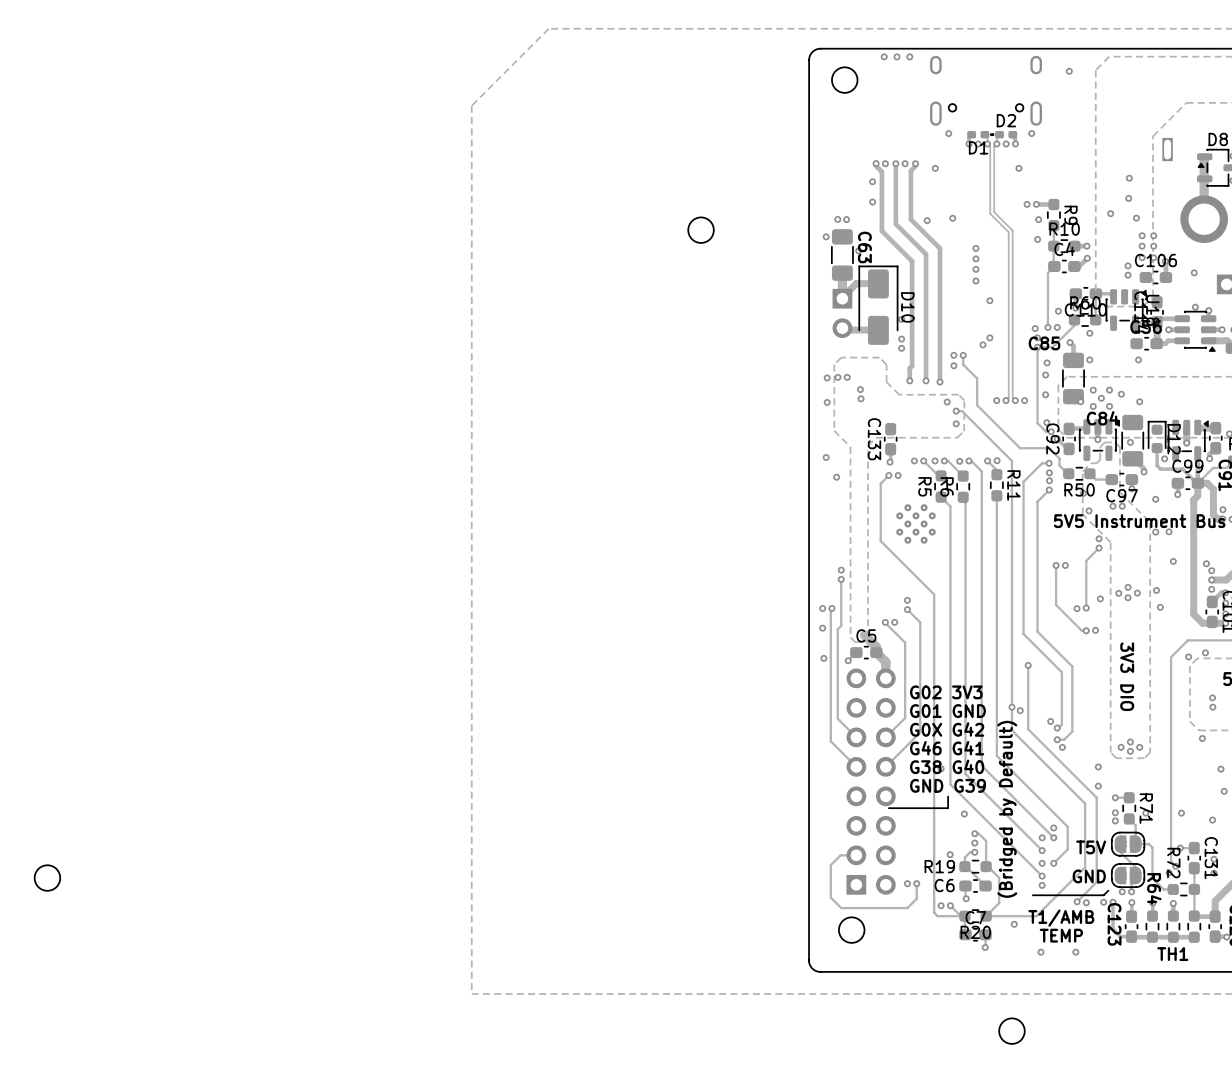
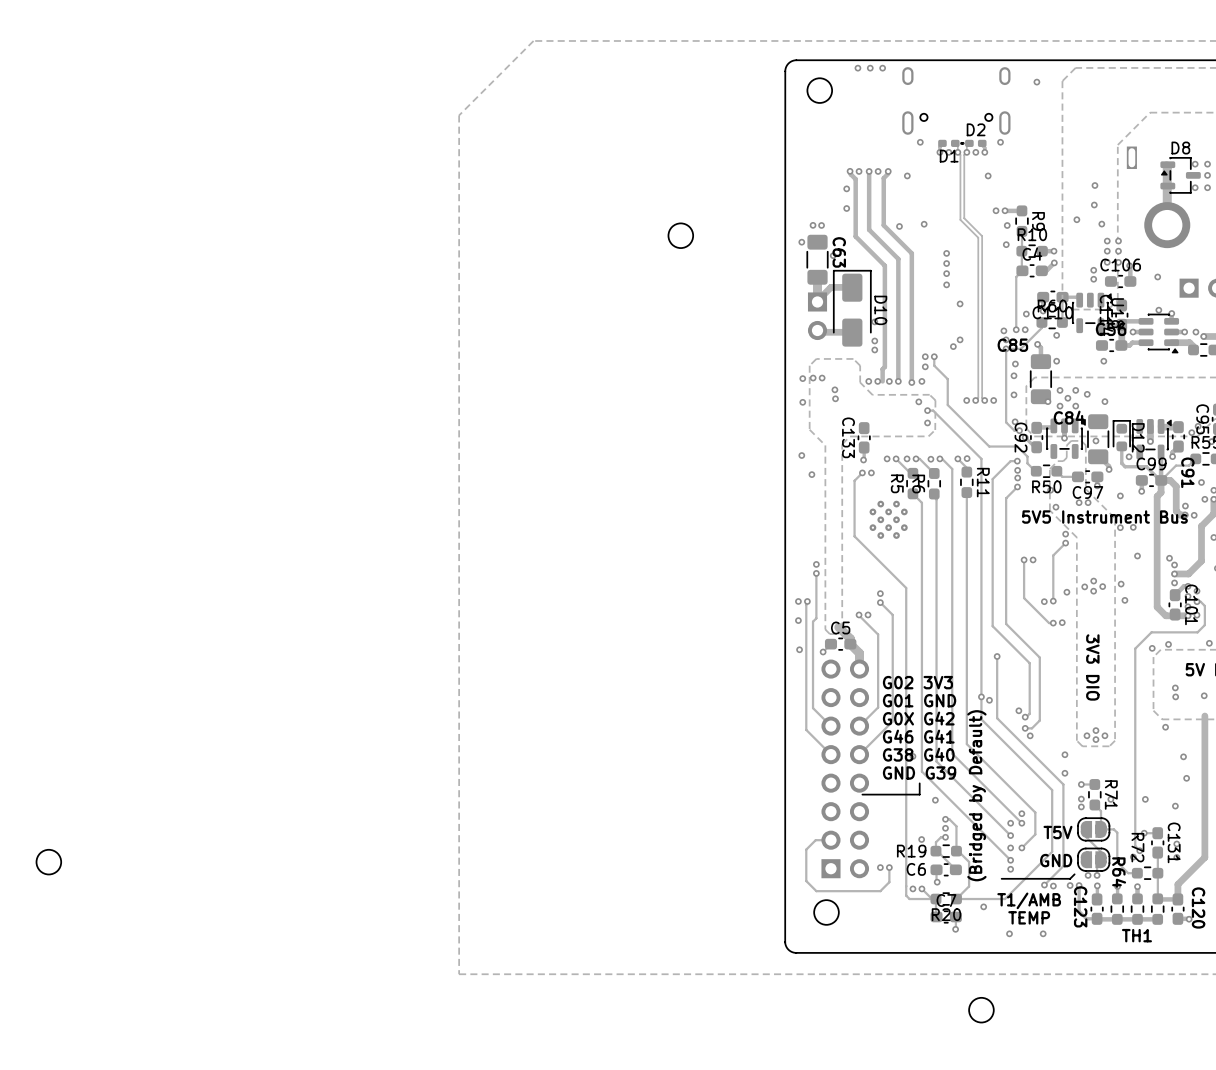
via: none -> (868, 381)
via: none -> (877, 381)
via: (909, 380) -> none
via: none -> (889, 381)
via: none -> (921, 381)

